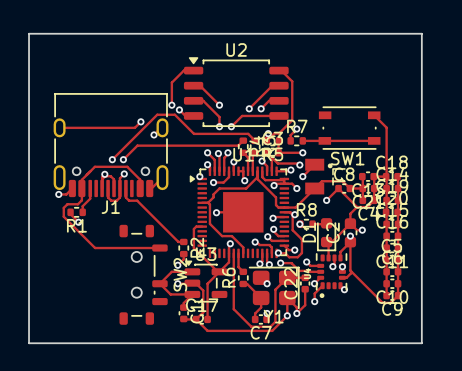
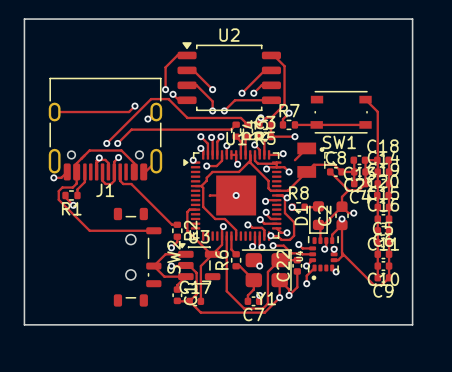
track: (267, 152) (277, 163) (299, 165) -> none
via: (299, 165) -> none
via: (302, 176) -> none
track: (338, 188) (326, 200) -> none
via: (326, 200) -> none
via position: (216, 212) -> (236, 195)

